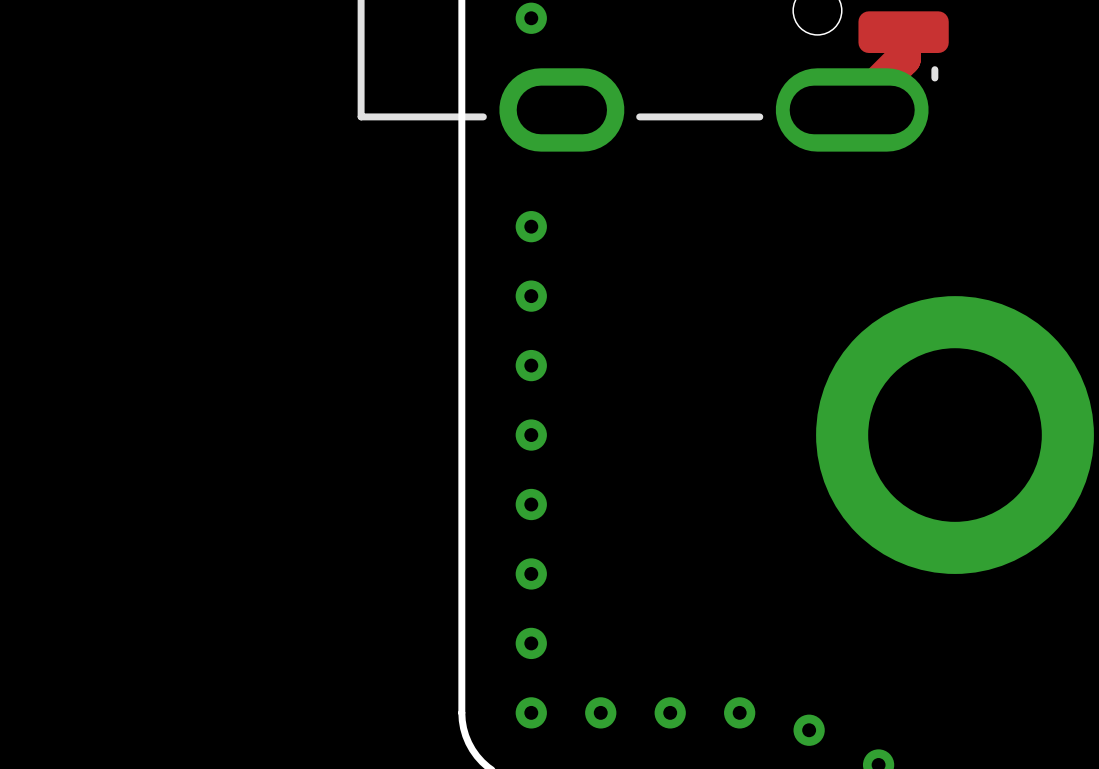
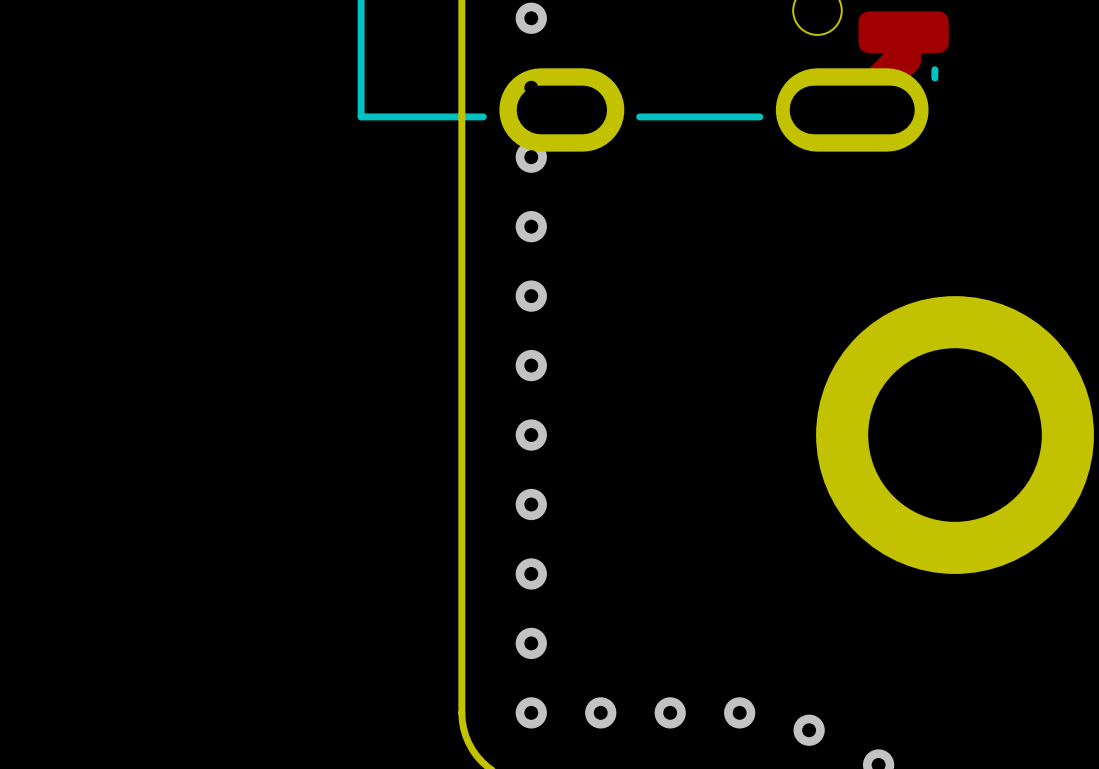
via: none -> (531, 87)
via: none -> (531, 157)

